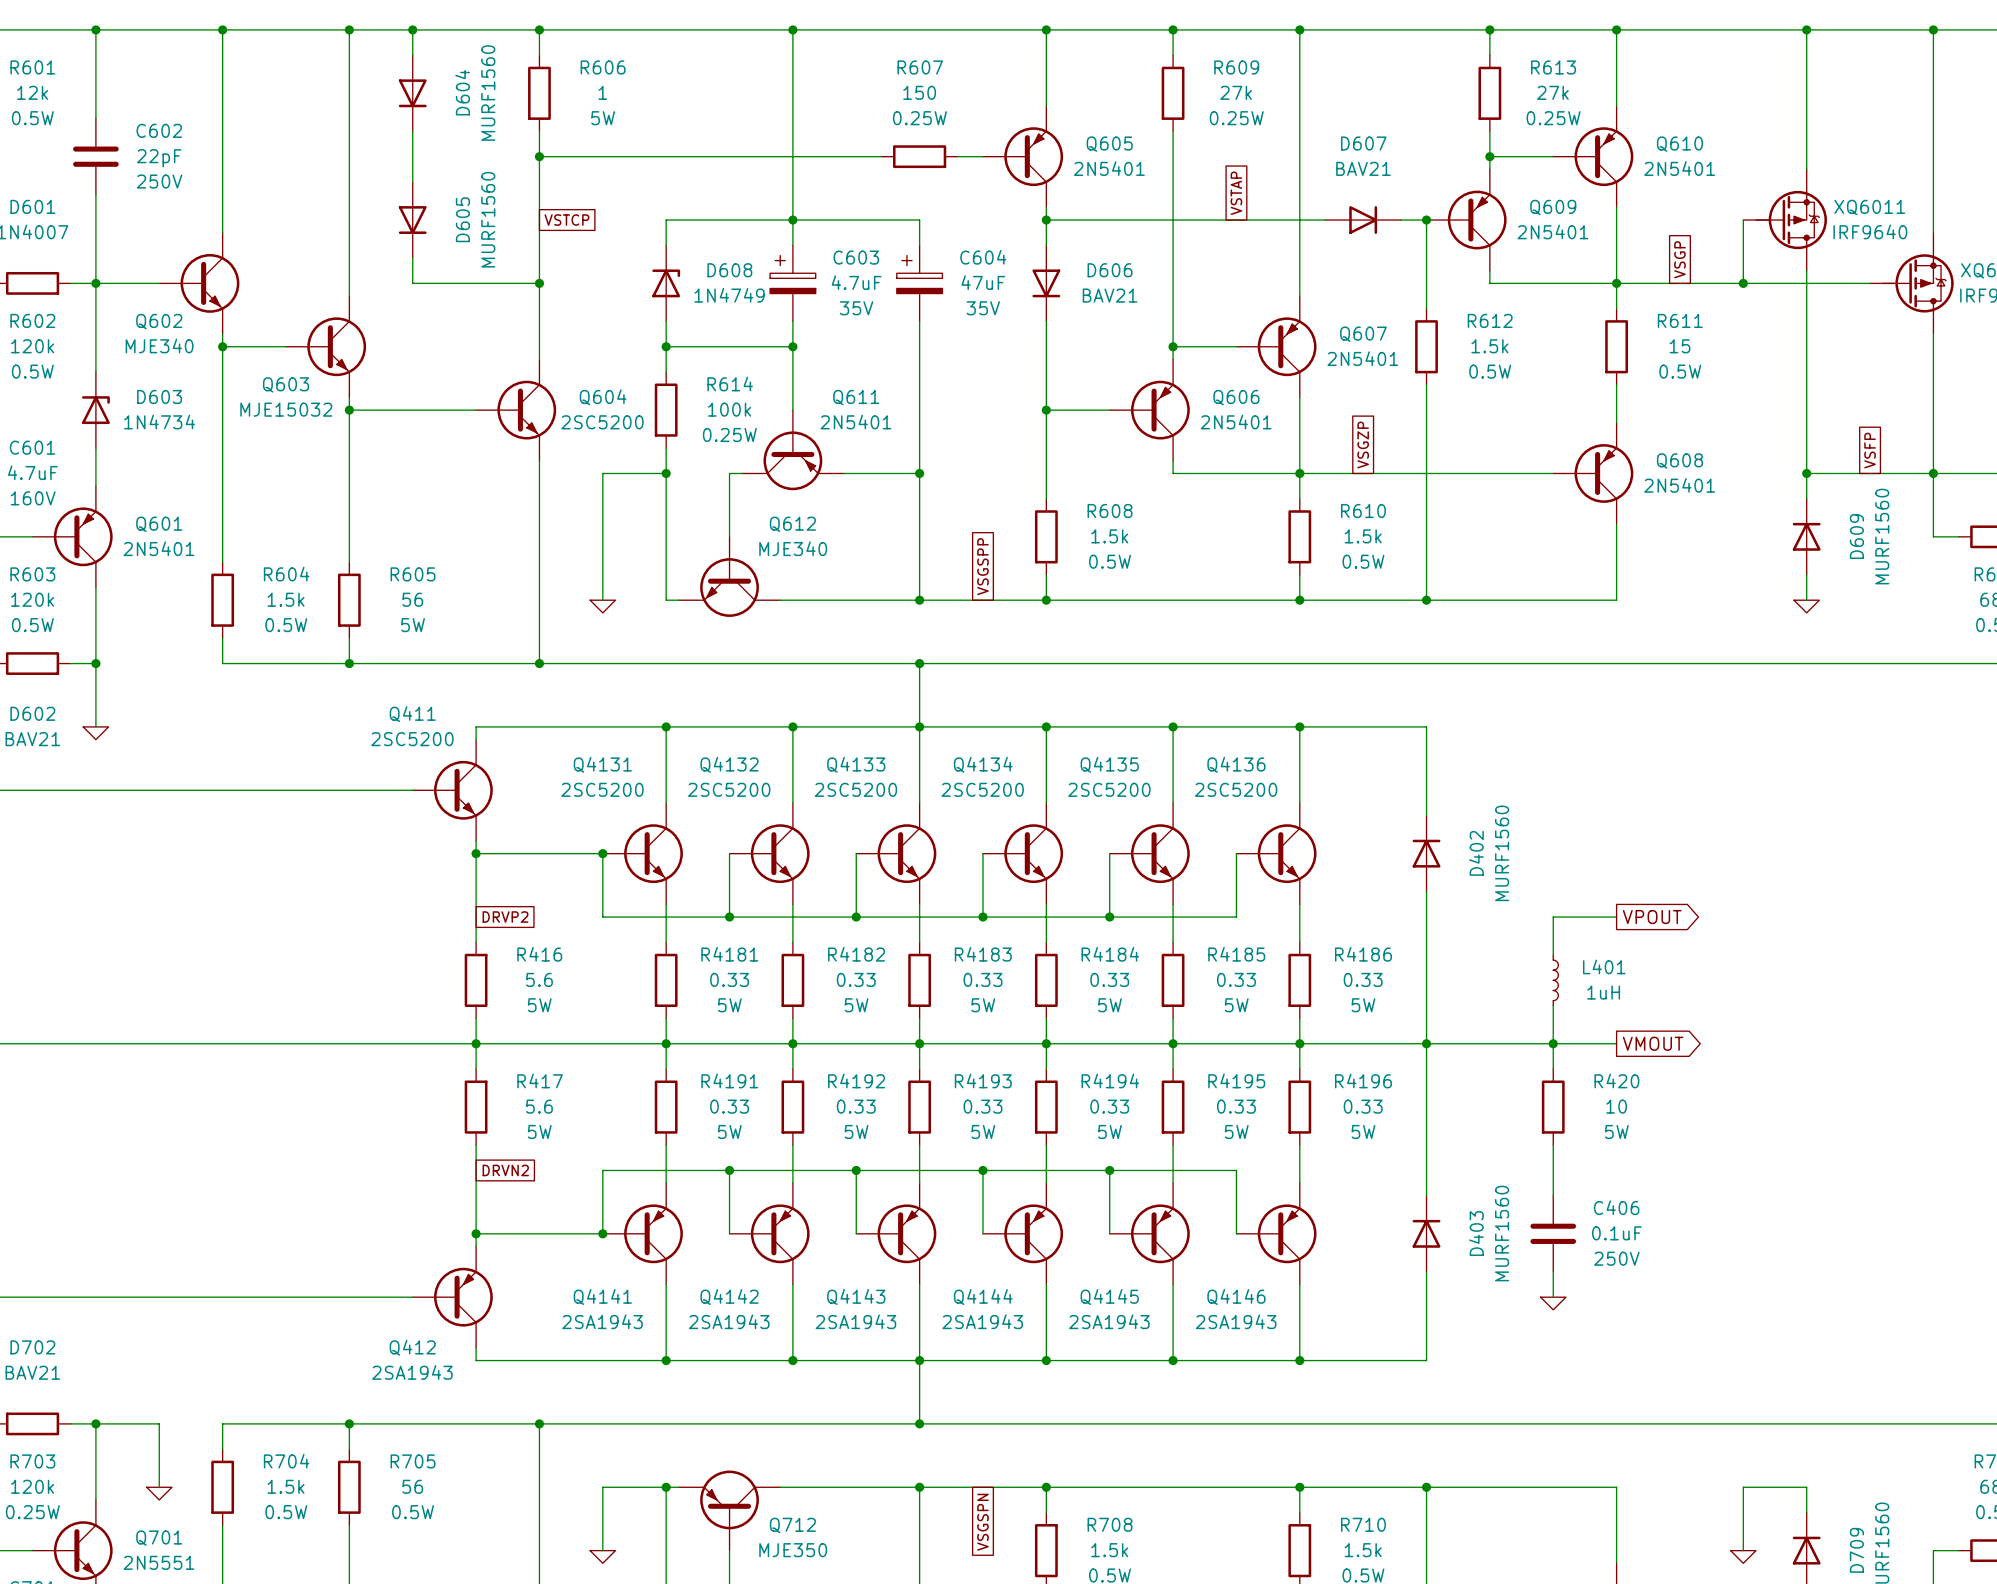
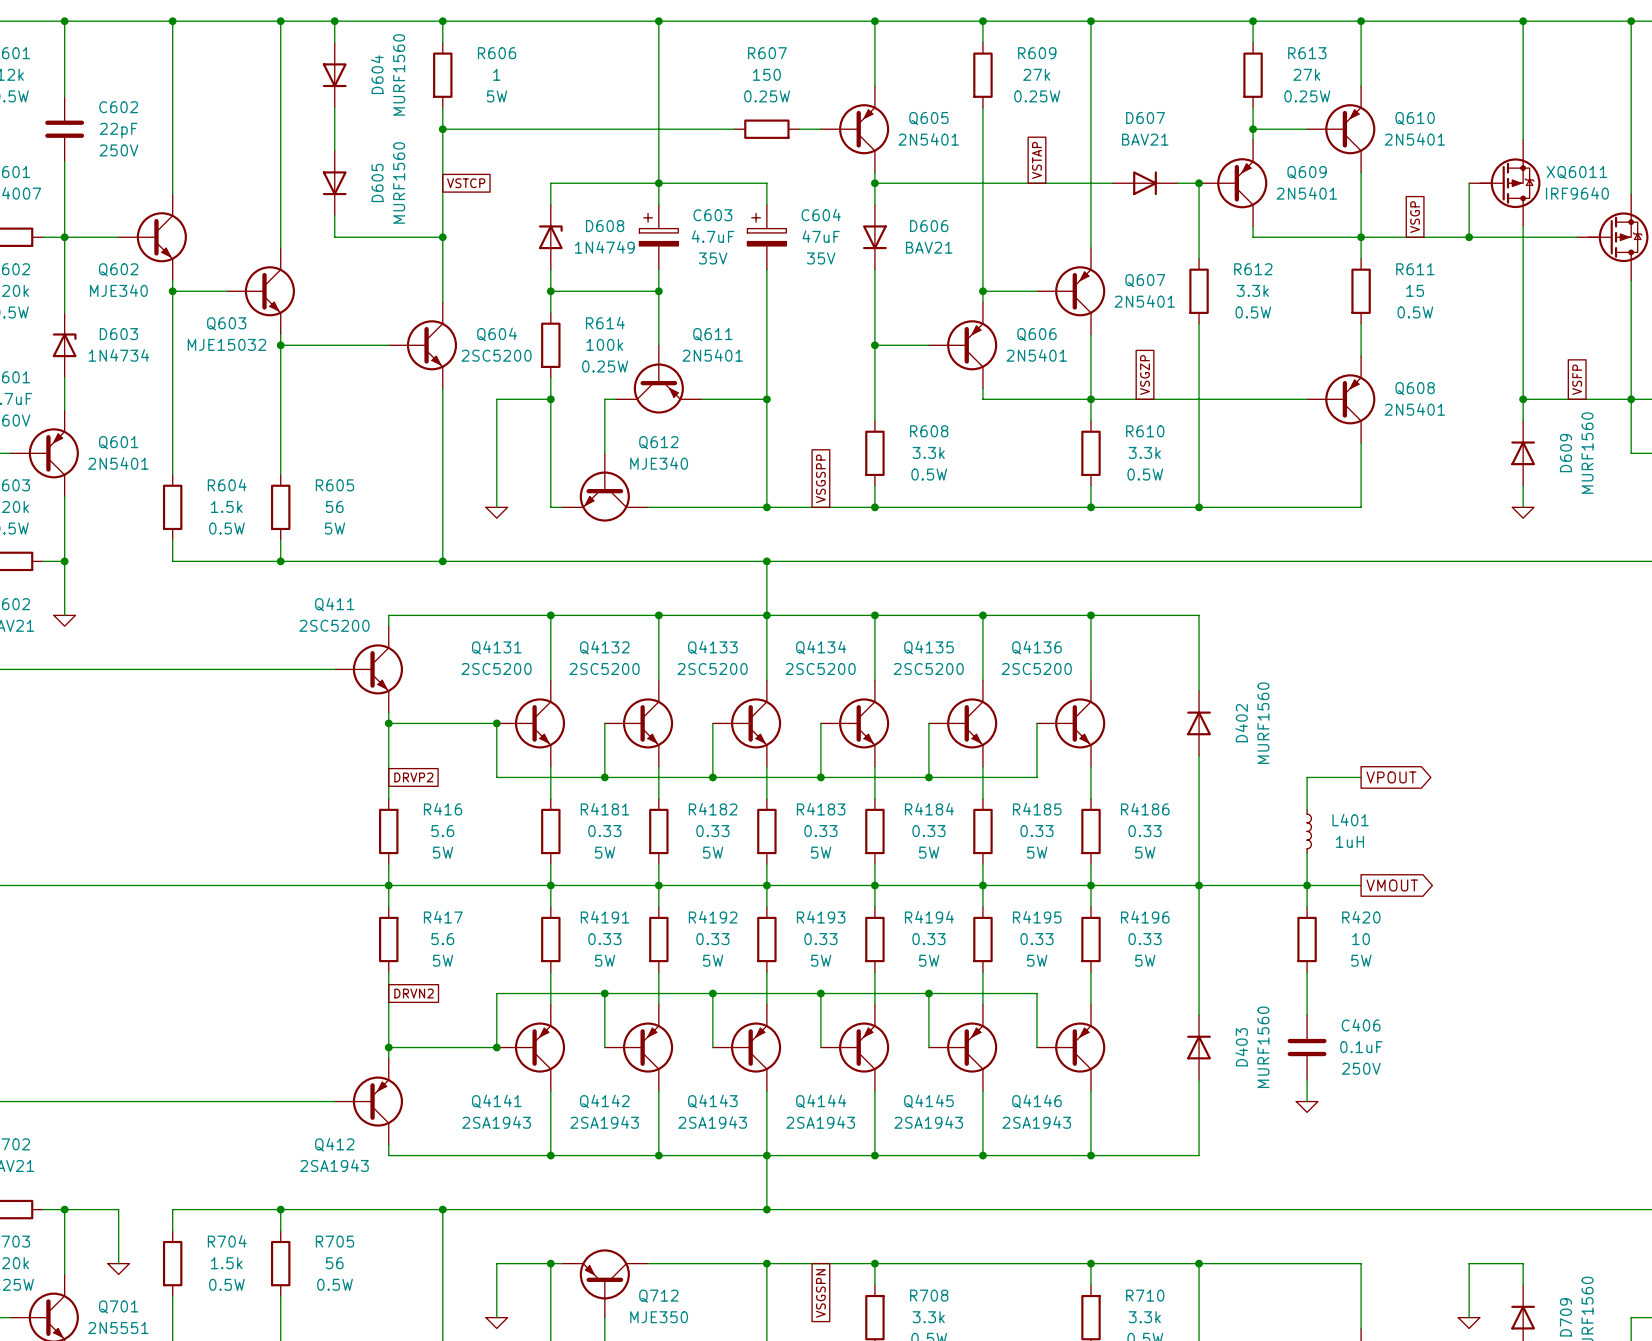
R612 value: 1.5k (1489, 346) -> 3.3k (1252, 290)
R608 value: 1.5k (1109, 536) -> 3.3k (928, 452)
R610 value: 1.5k (1363, 536) -> 3.3k (1144, 452)
R708 value: 1.5k (1109, 1550) -> 3.3k (928, 1317)
R710 value: 1.5k (1363, 1550) -> 3.3k (1144, 1317)

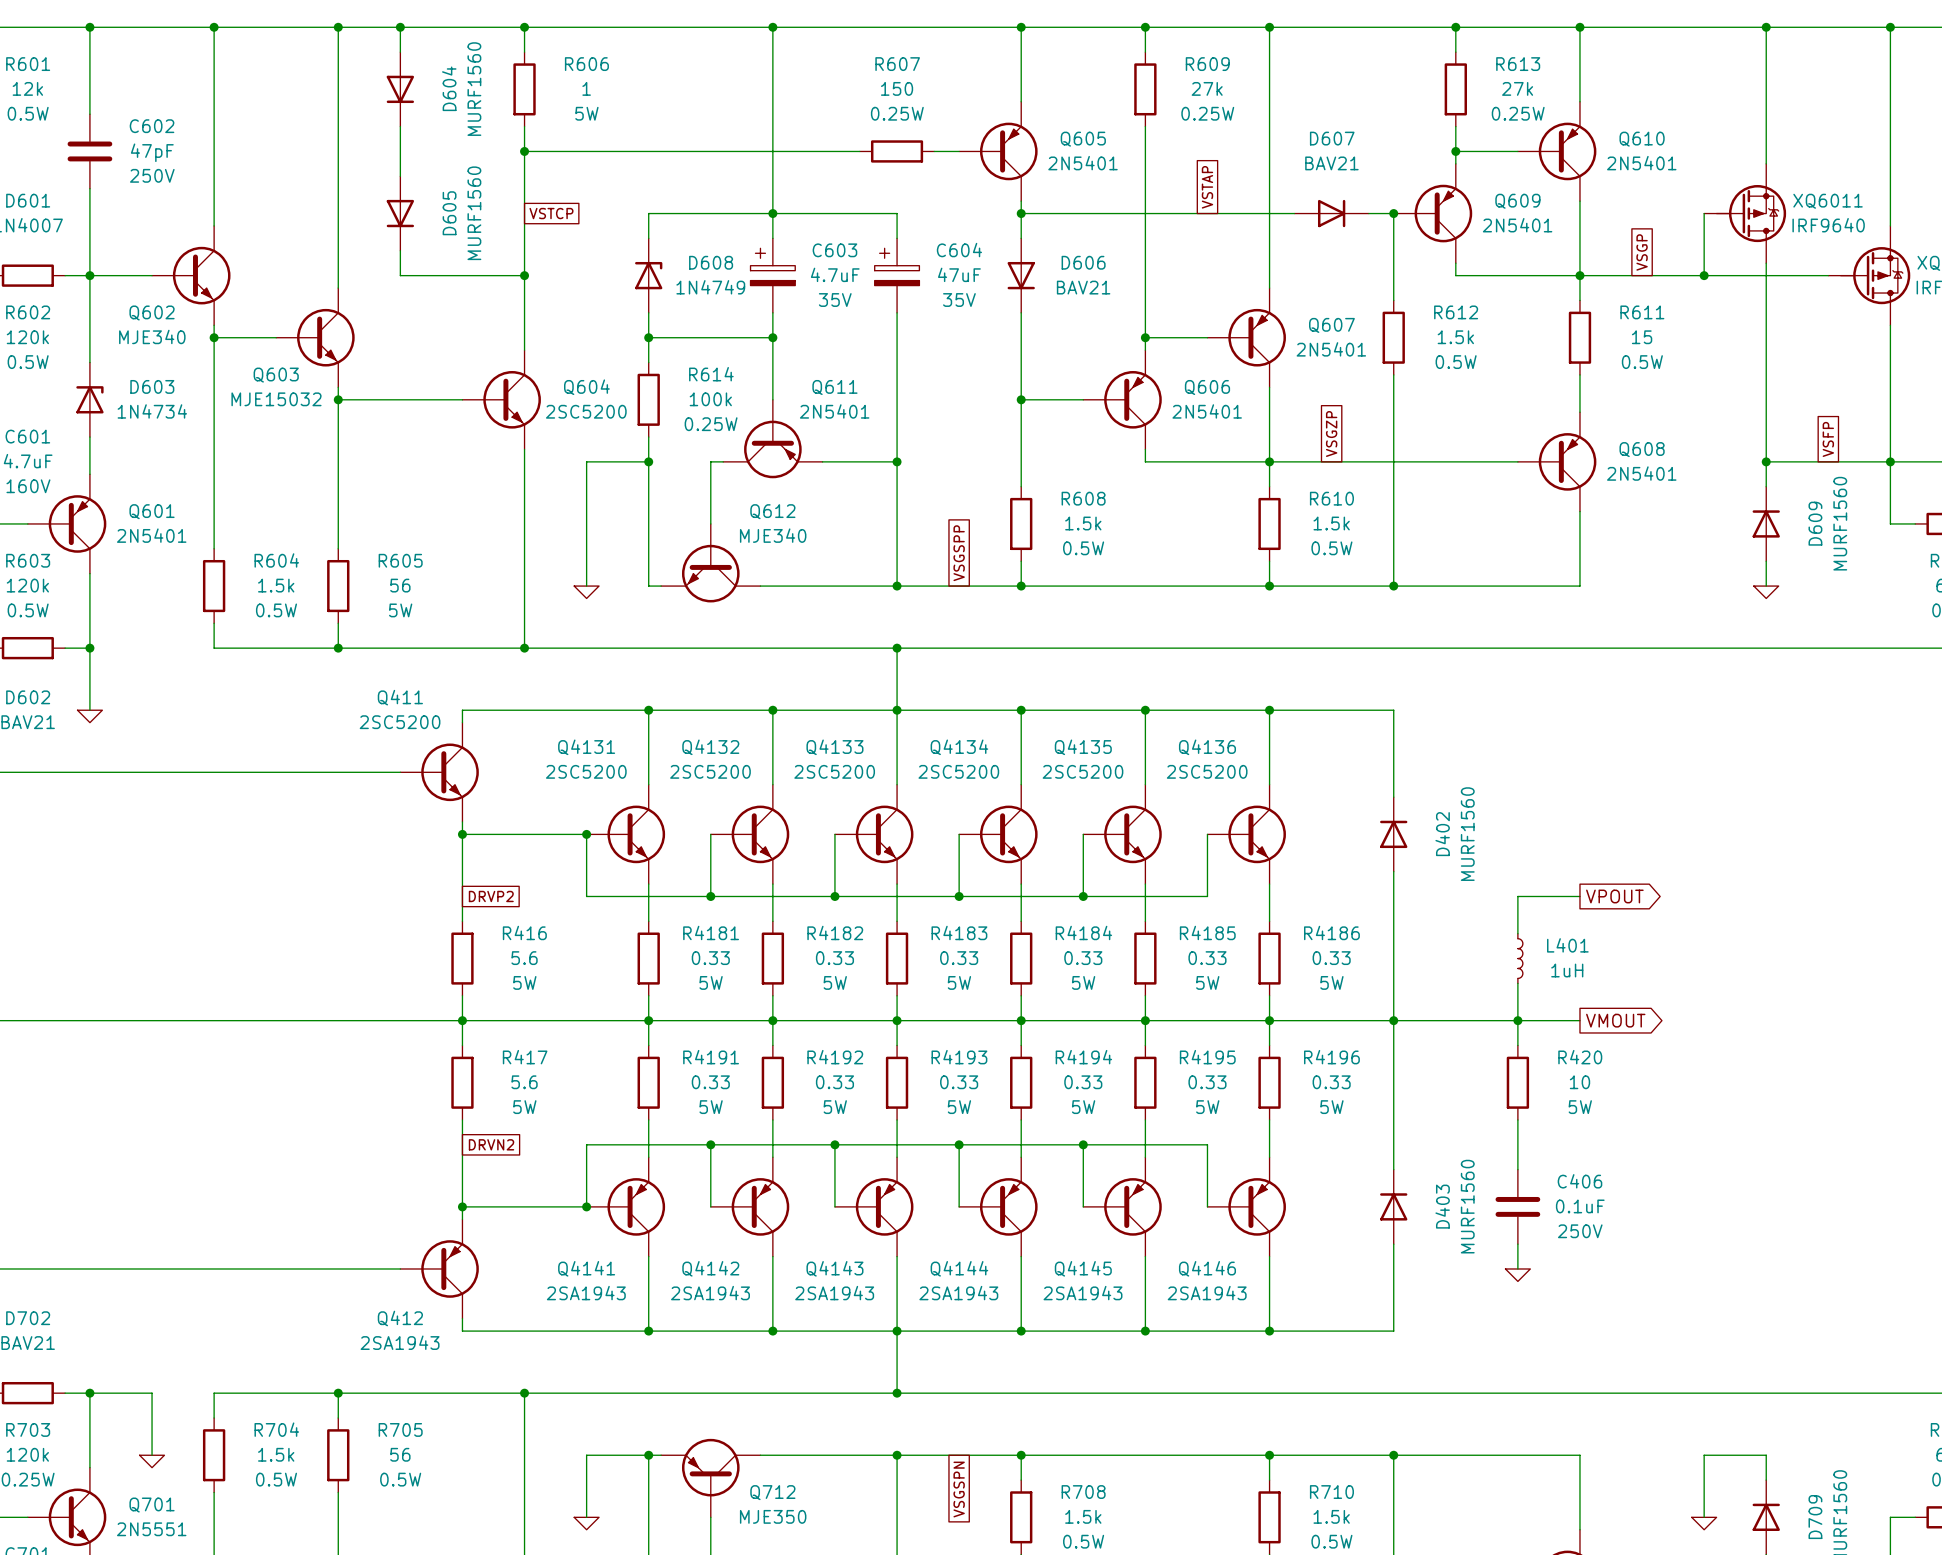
C602 value: 22pF (118, 130) -> 47pF (152, 152)
R612 value: 3.3k (1252, 290) -> 1.5k (1455, 337)
R608 value: 3.3k (928, 452) -> 1.5k (1083, 523)
R610 value: 3.3k (1144, 452) -> 1.5k (1331, 523)
R708 value: 3.3k (928, 1317) -> 1.5k (1083, 1516)
R710 value: 3.3k (1144, 1317) -> 1.5k (1331, 1516)

